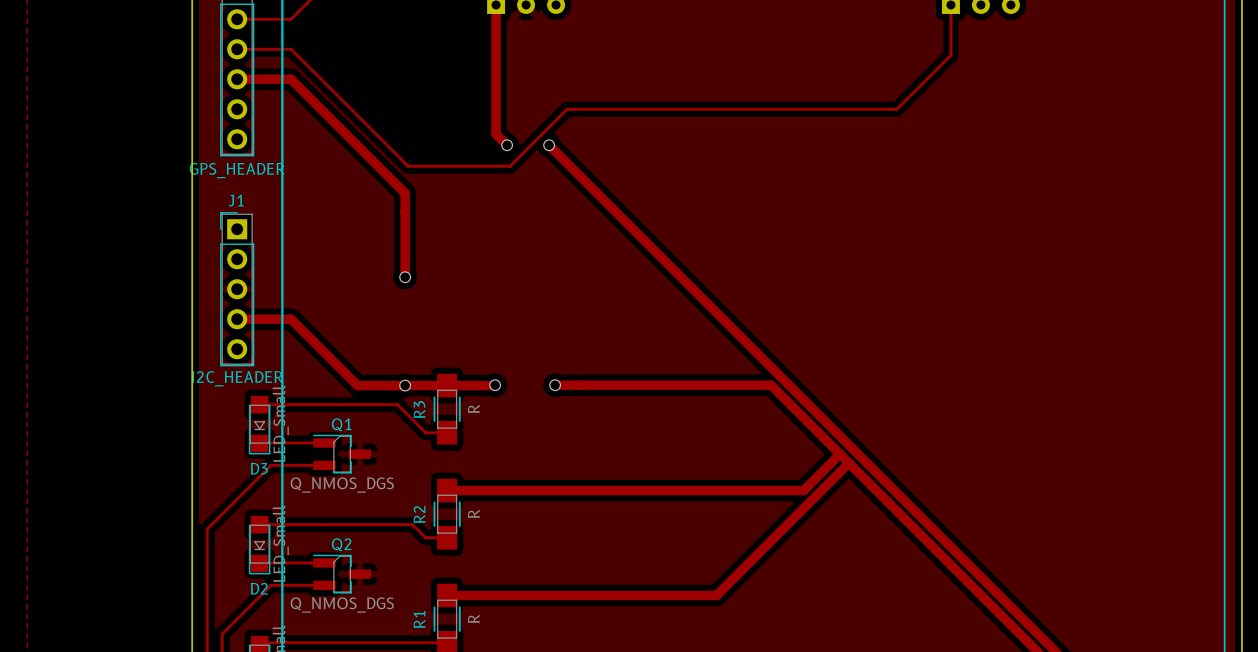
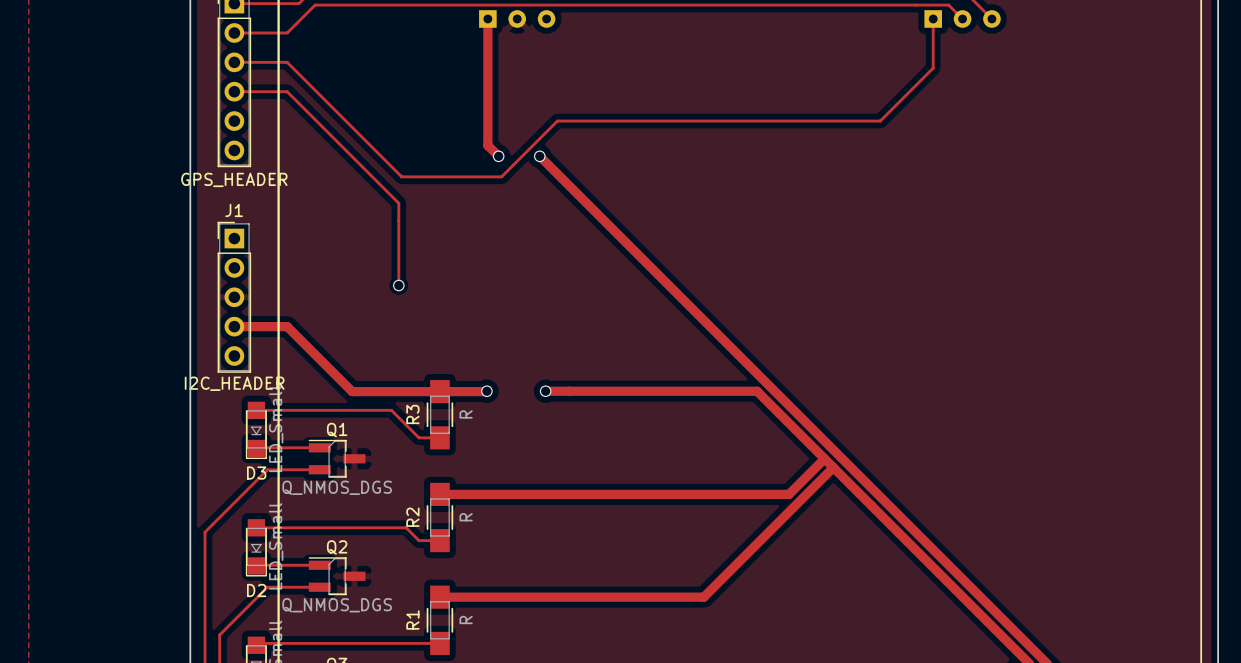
track width: thick (237, 79) (291, 79) (405, 193) (405, 277) -> thin (234, 91) (287, 91) (398, 203) (398, 285)
via: (405, 385) -> none

